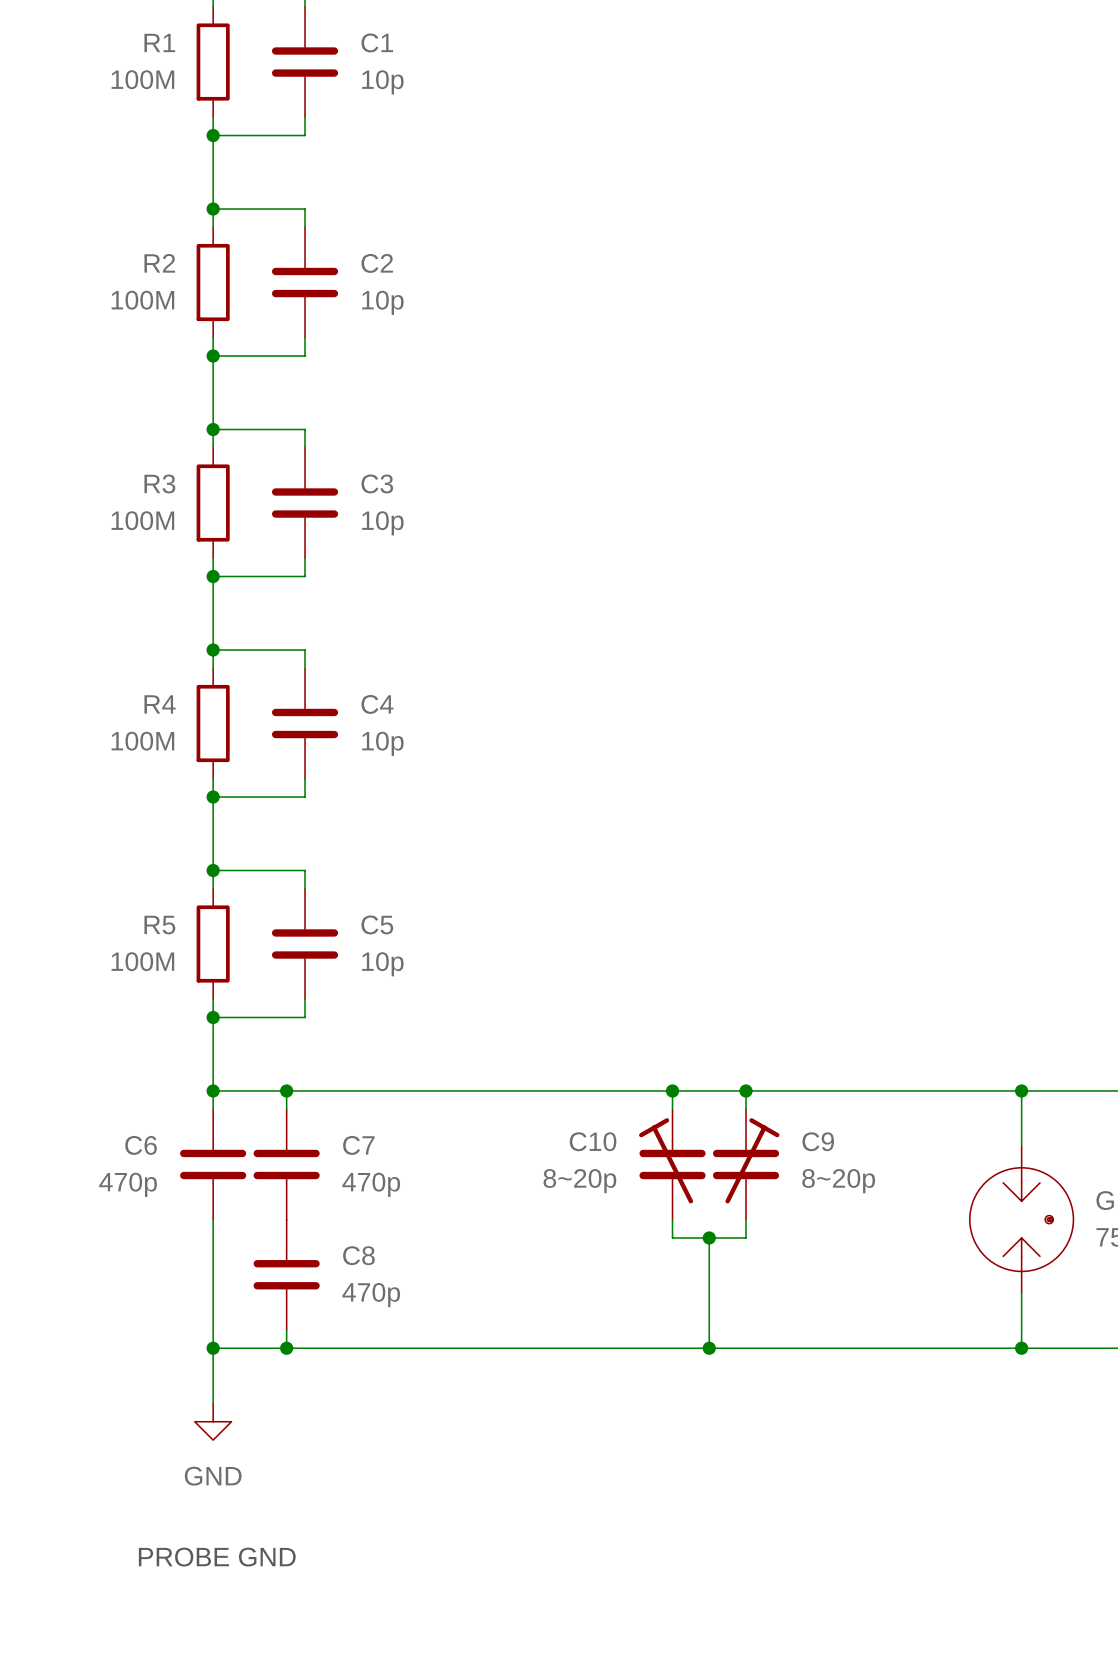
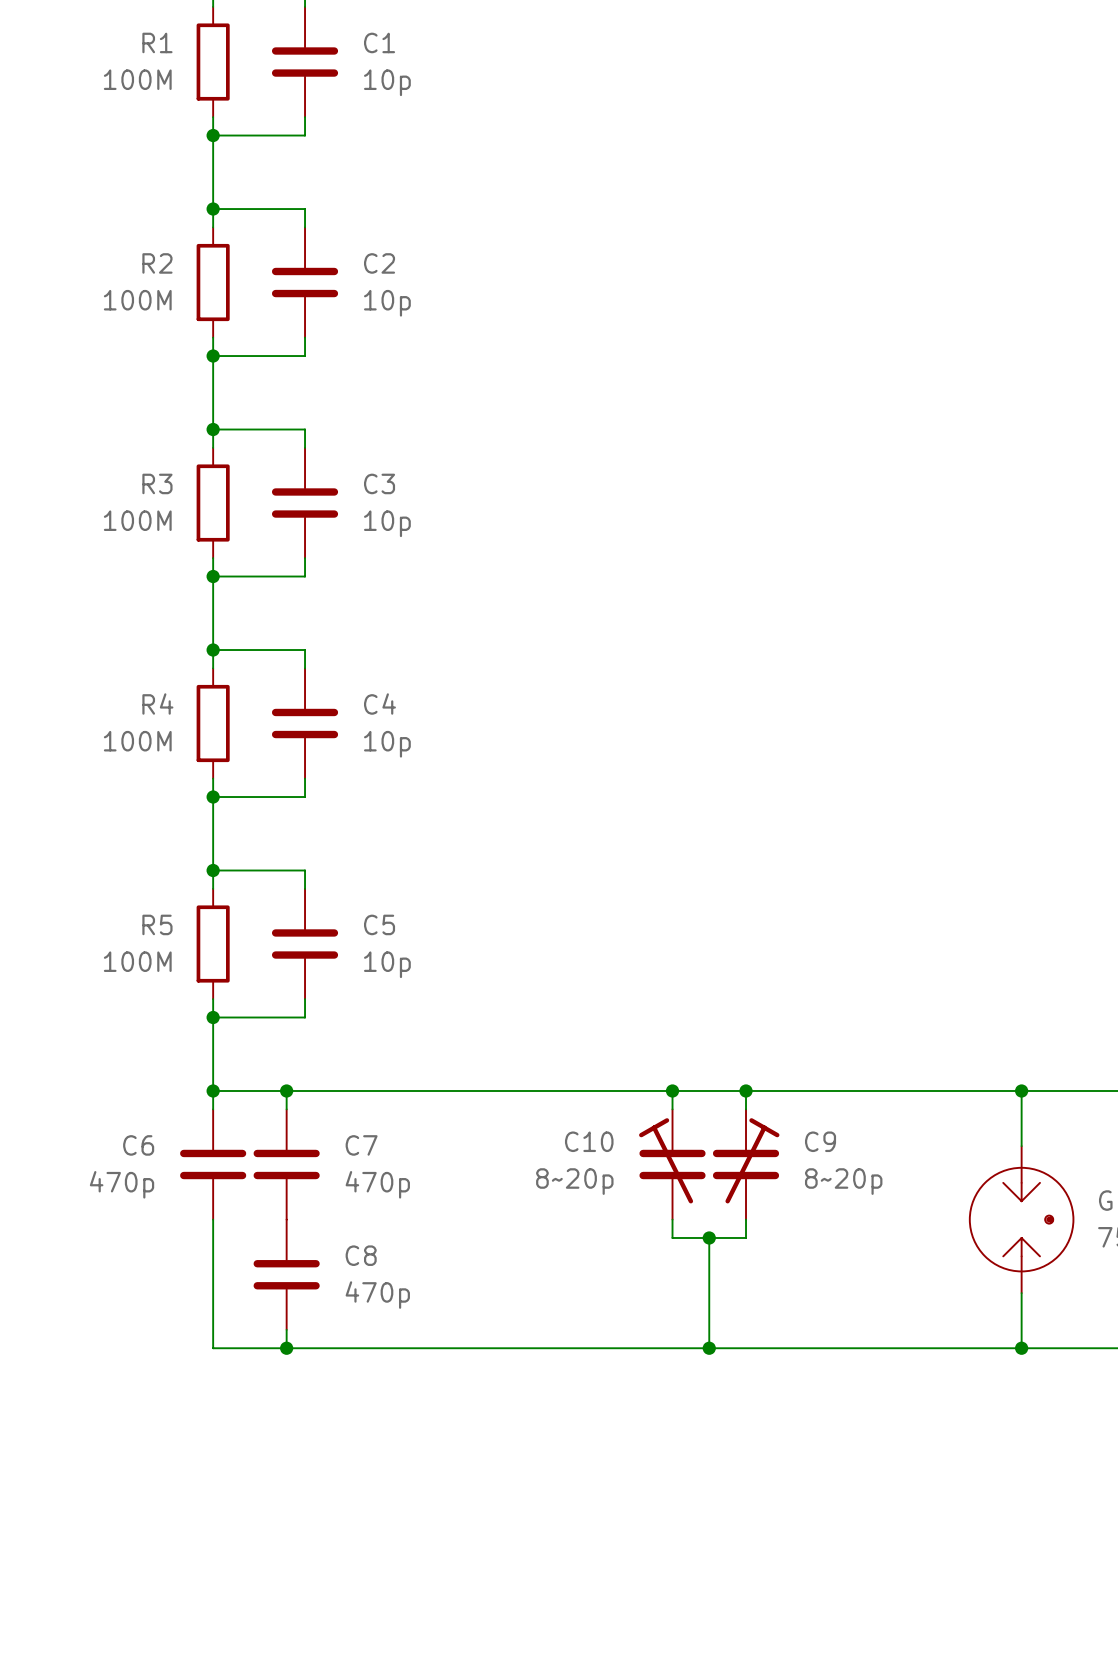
wire: (213, 1348) (213, 1403) -> none
junction: (213, 1348) -> none
power symbol: GND (213, 1421) -> none
text: PROBE GND (217, 1557) -> none

